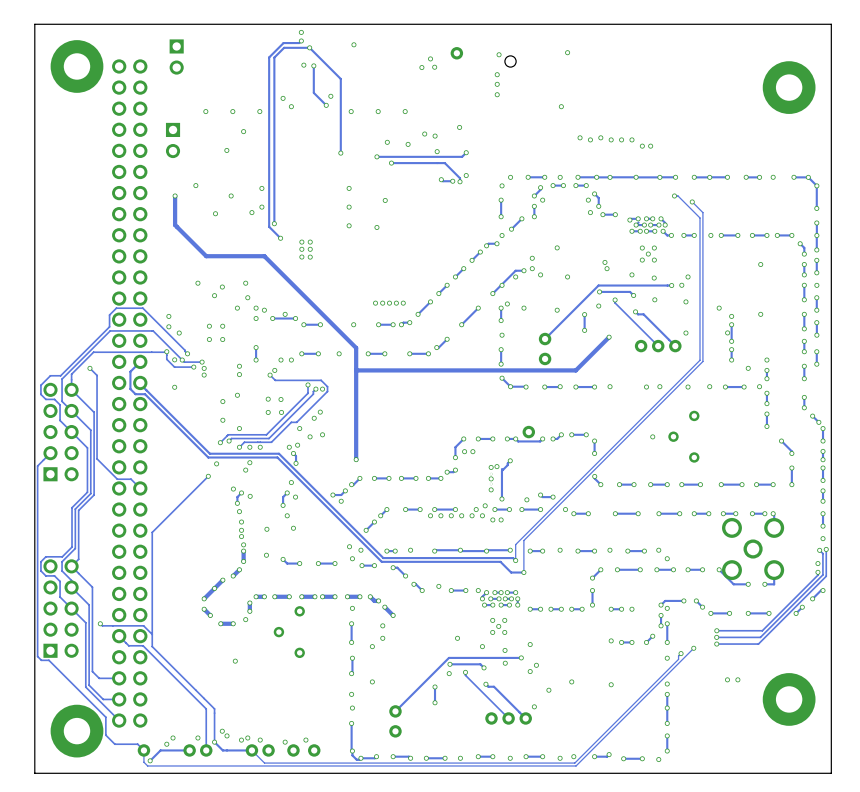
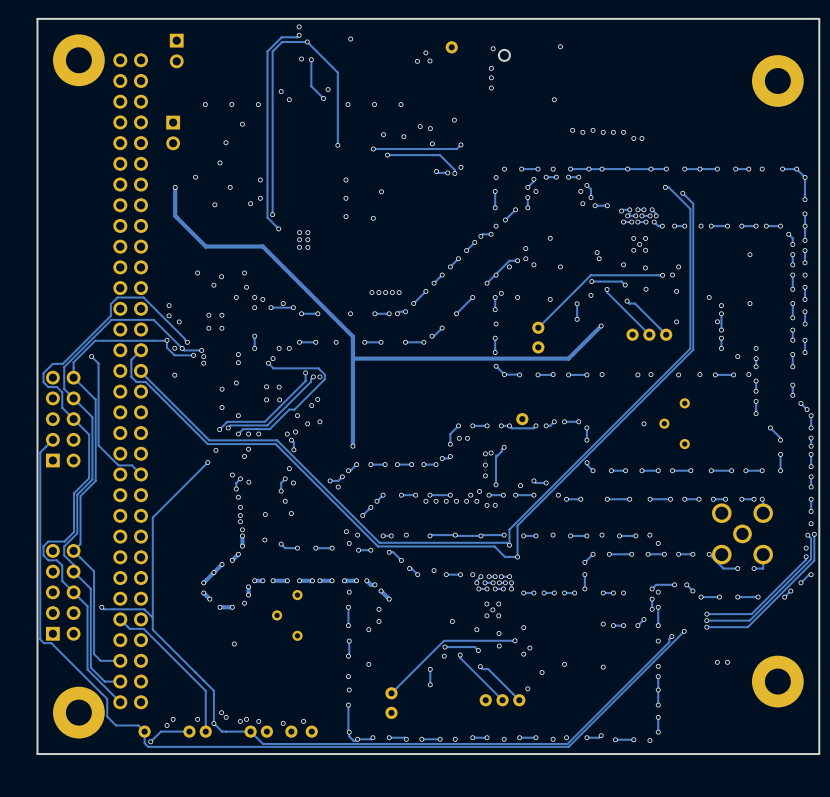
via: none -> (220, 162)

